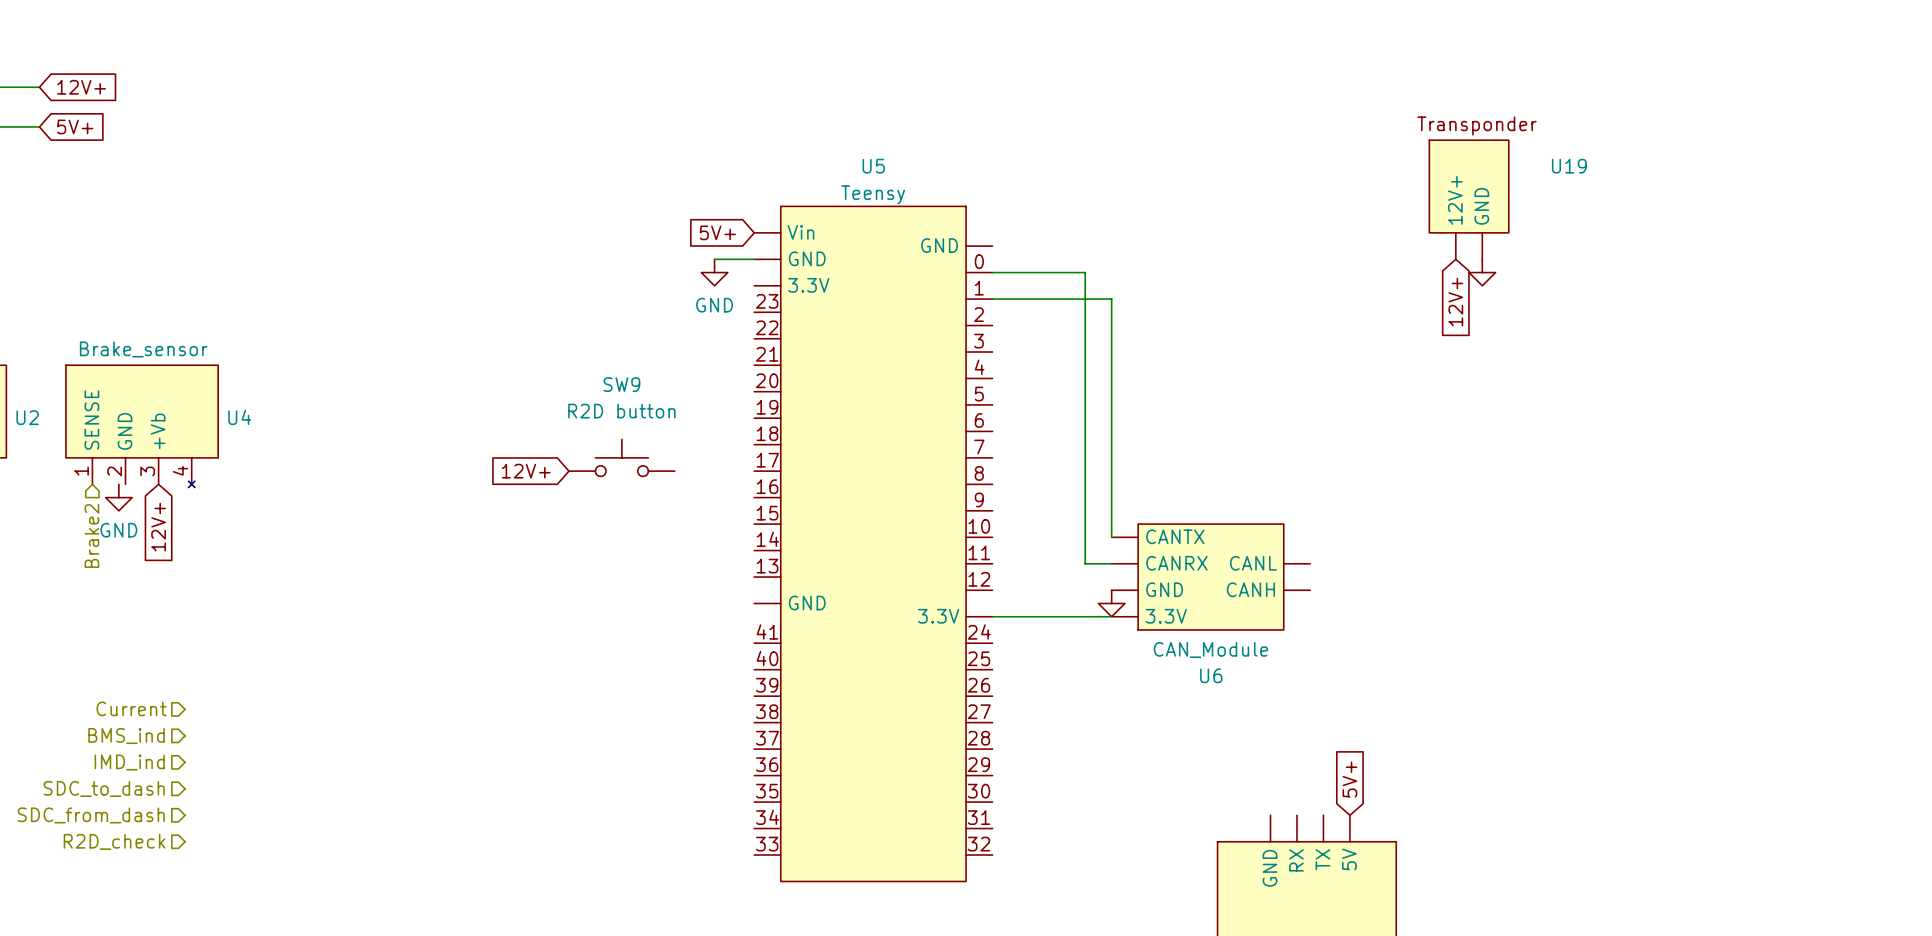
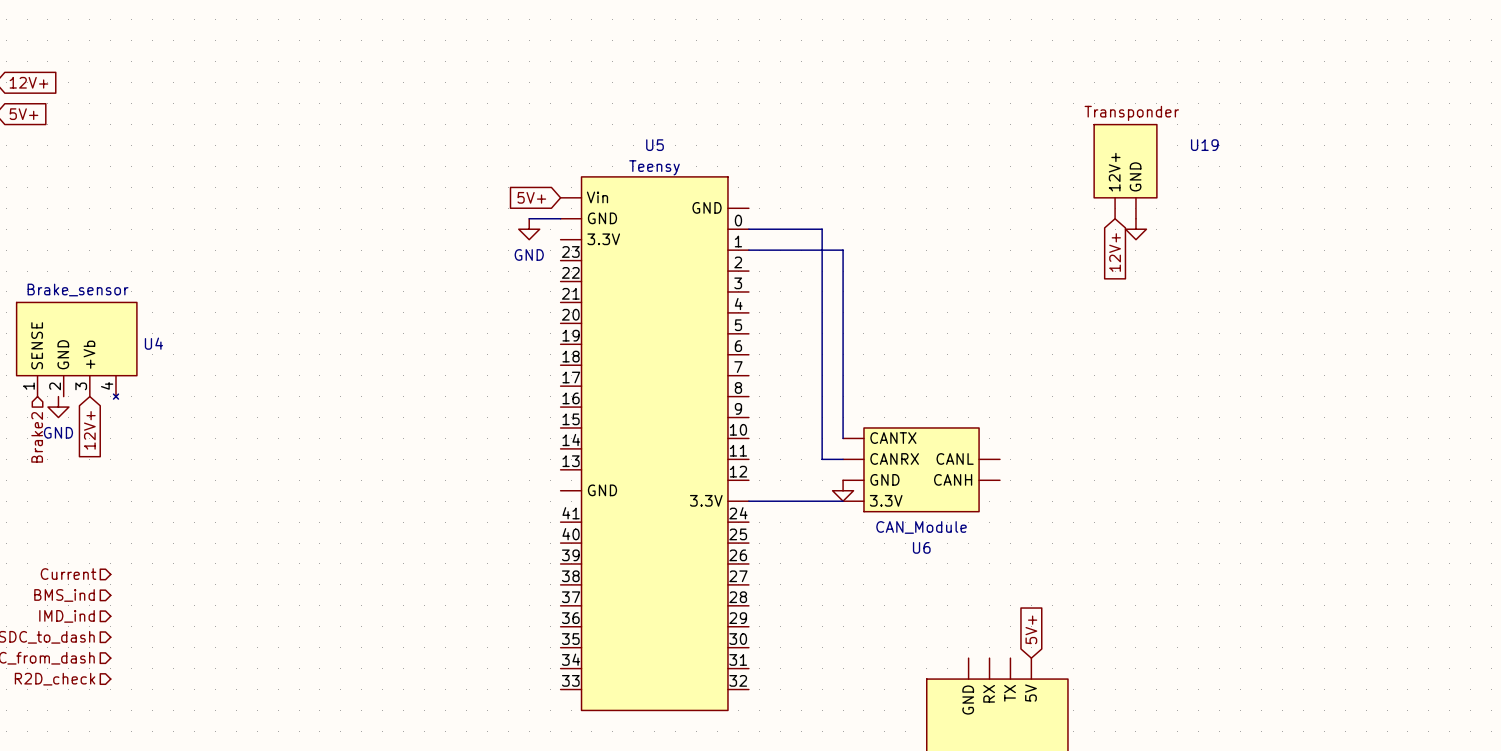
SW9: R2D button (621, 457) -> none
global label: 12V+ (526, 471) -> none

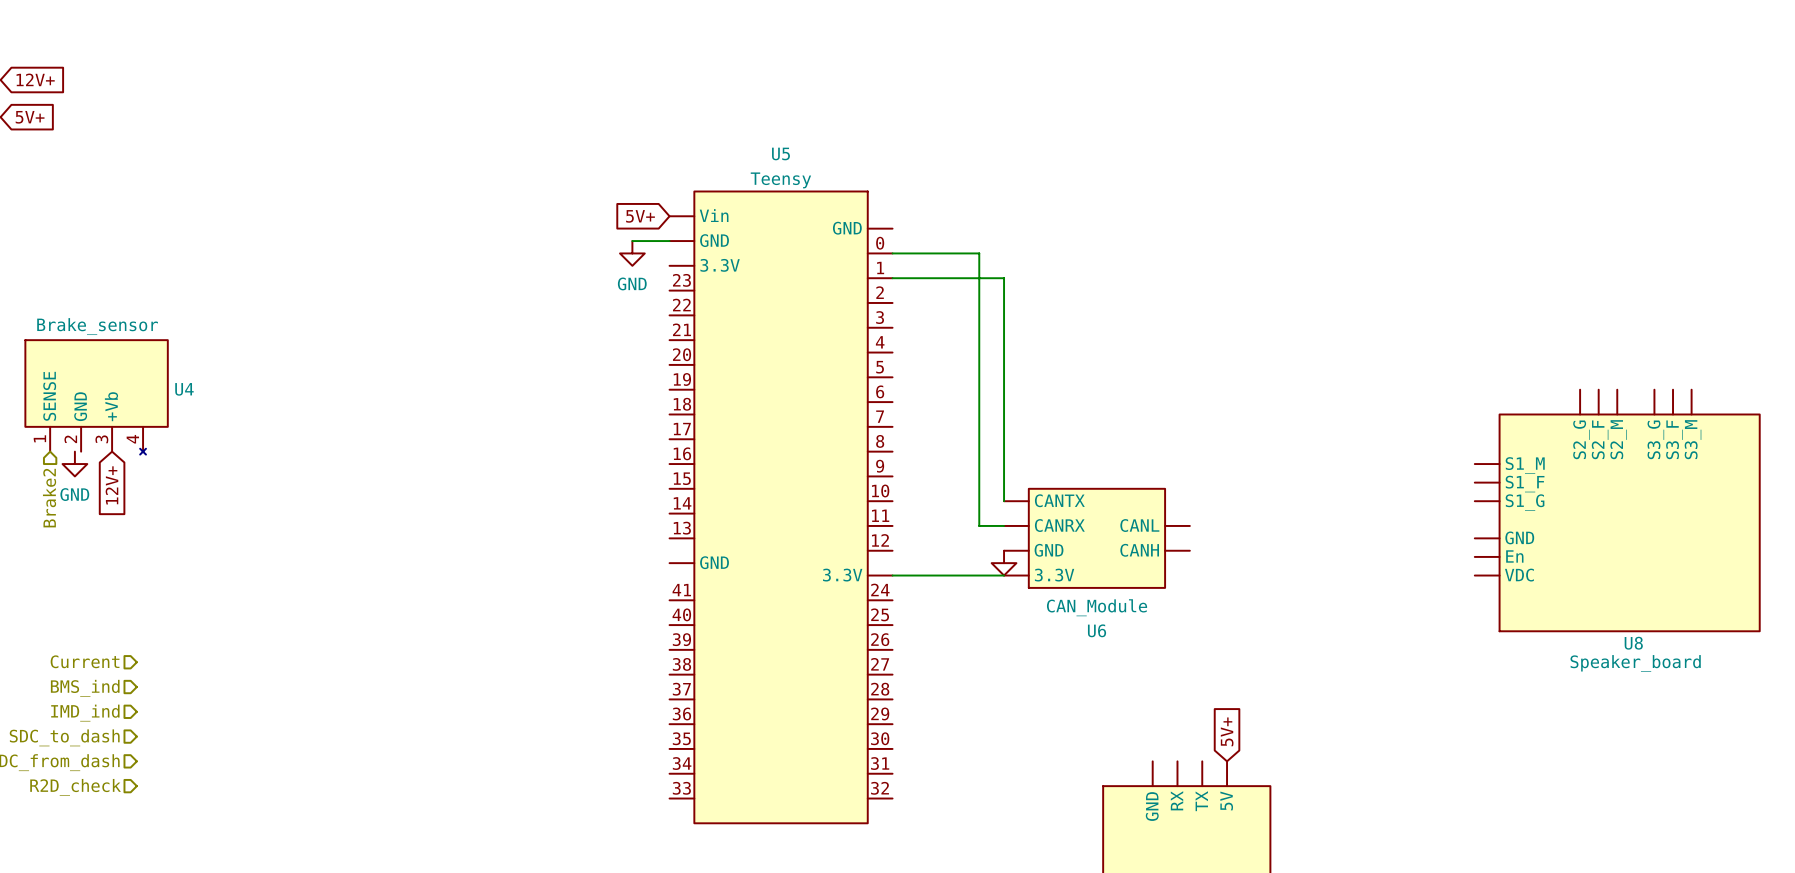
U19: (1125, 171) -> none
power symbol: (1135, 229) -> none
global label: 12V+ (1115, 252) -> none
U8: none -> Speaker_board (1617, 510)

